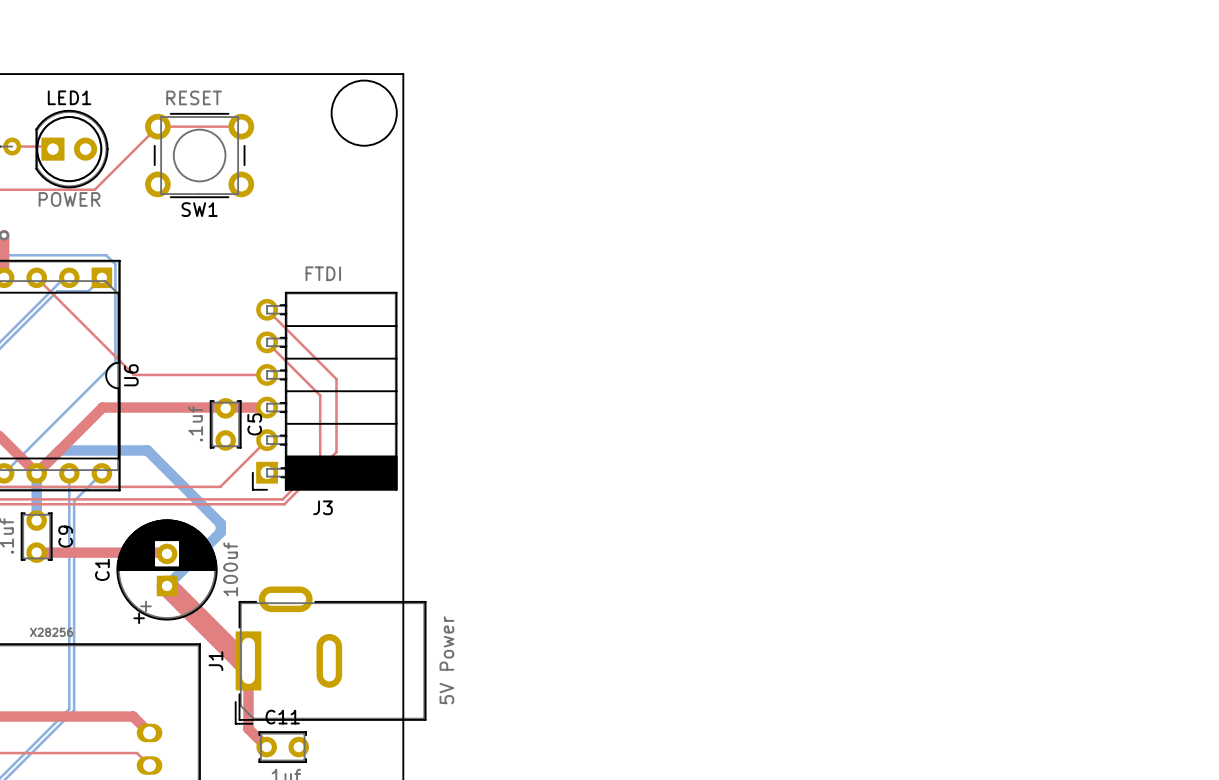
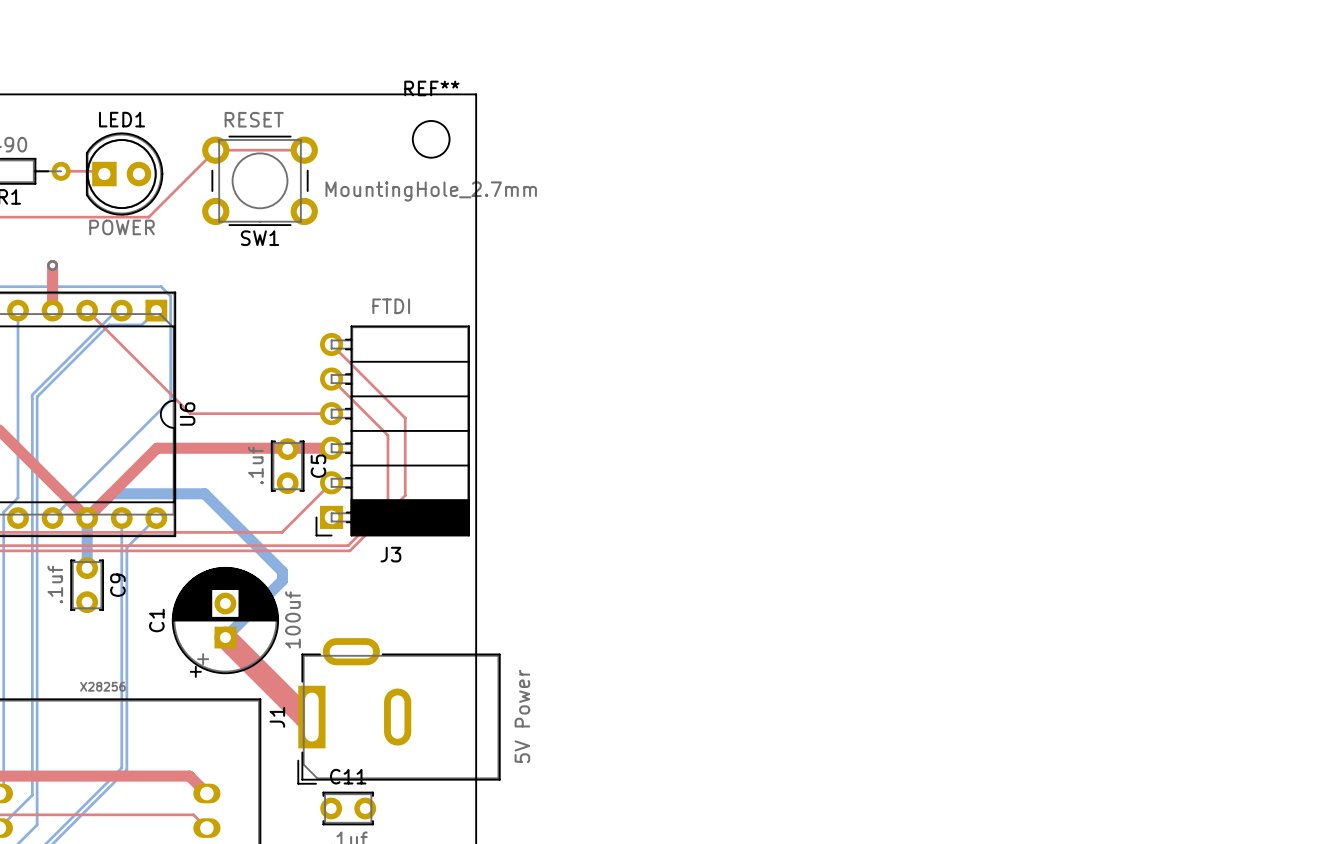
round board edge: [330, 79, 398, 147] -> none
REF**: none -> MountingHole_2.7mm (431, 139)
top track: (36, 552) (167, 553) -> none
top track: (248, 660) (248, 728) (266, 747) -> none

